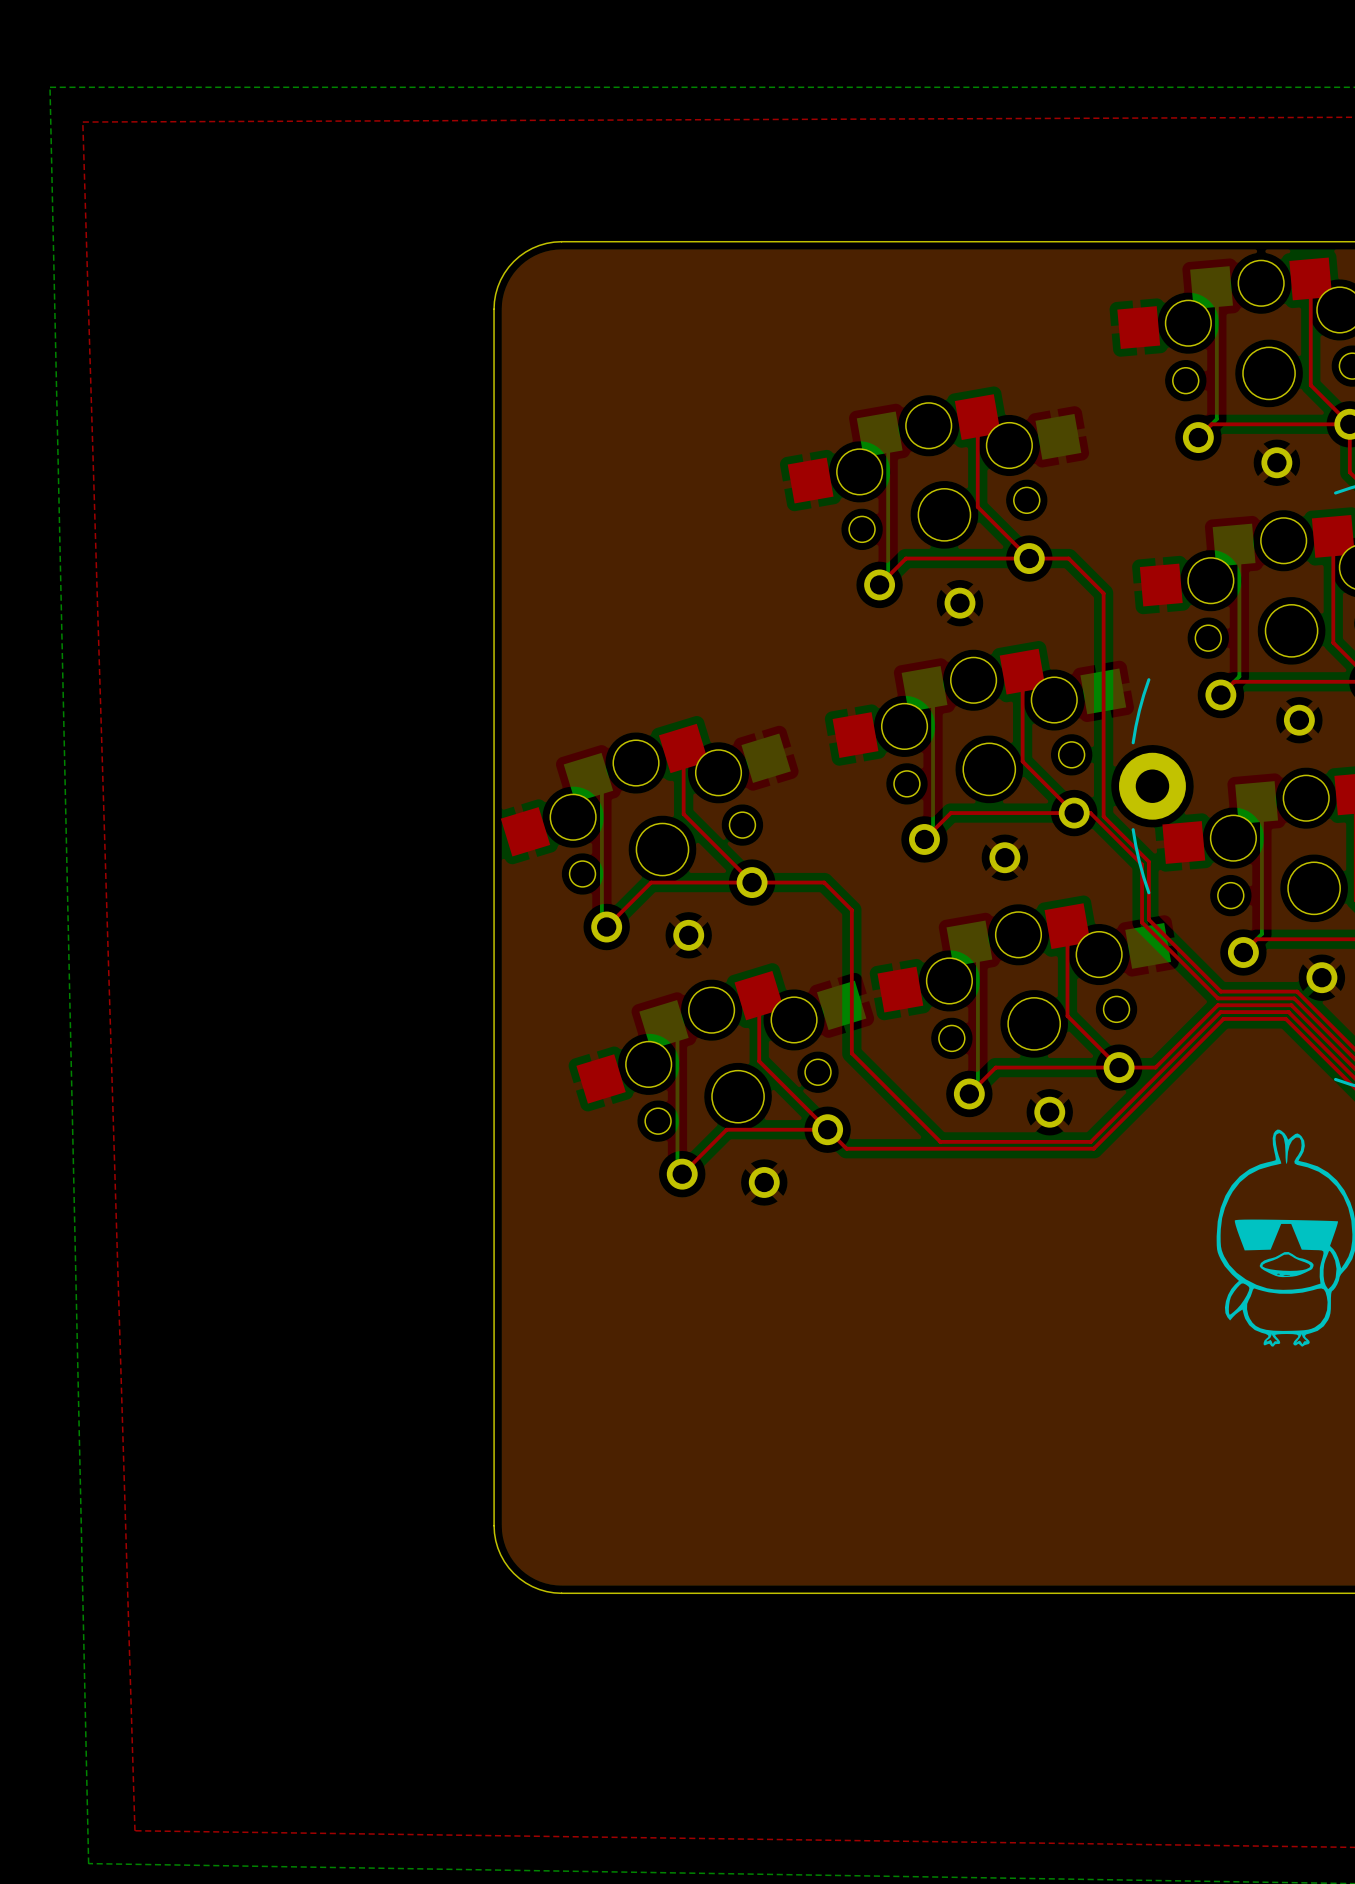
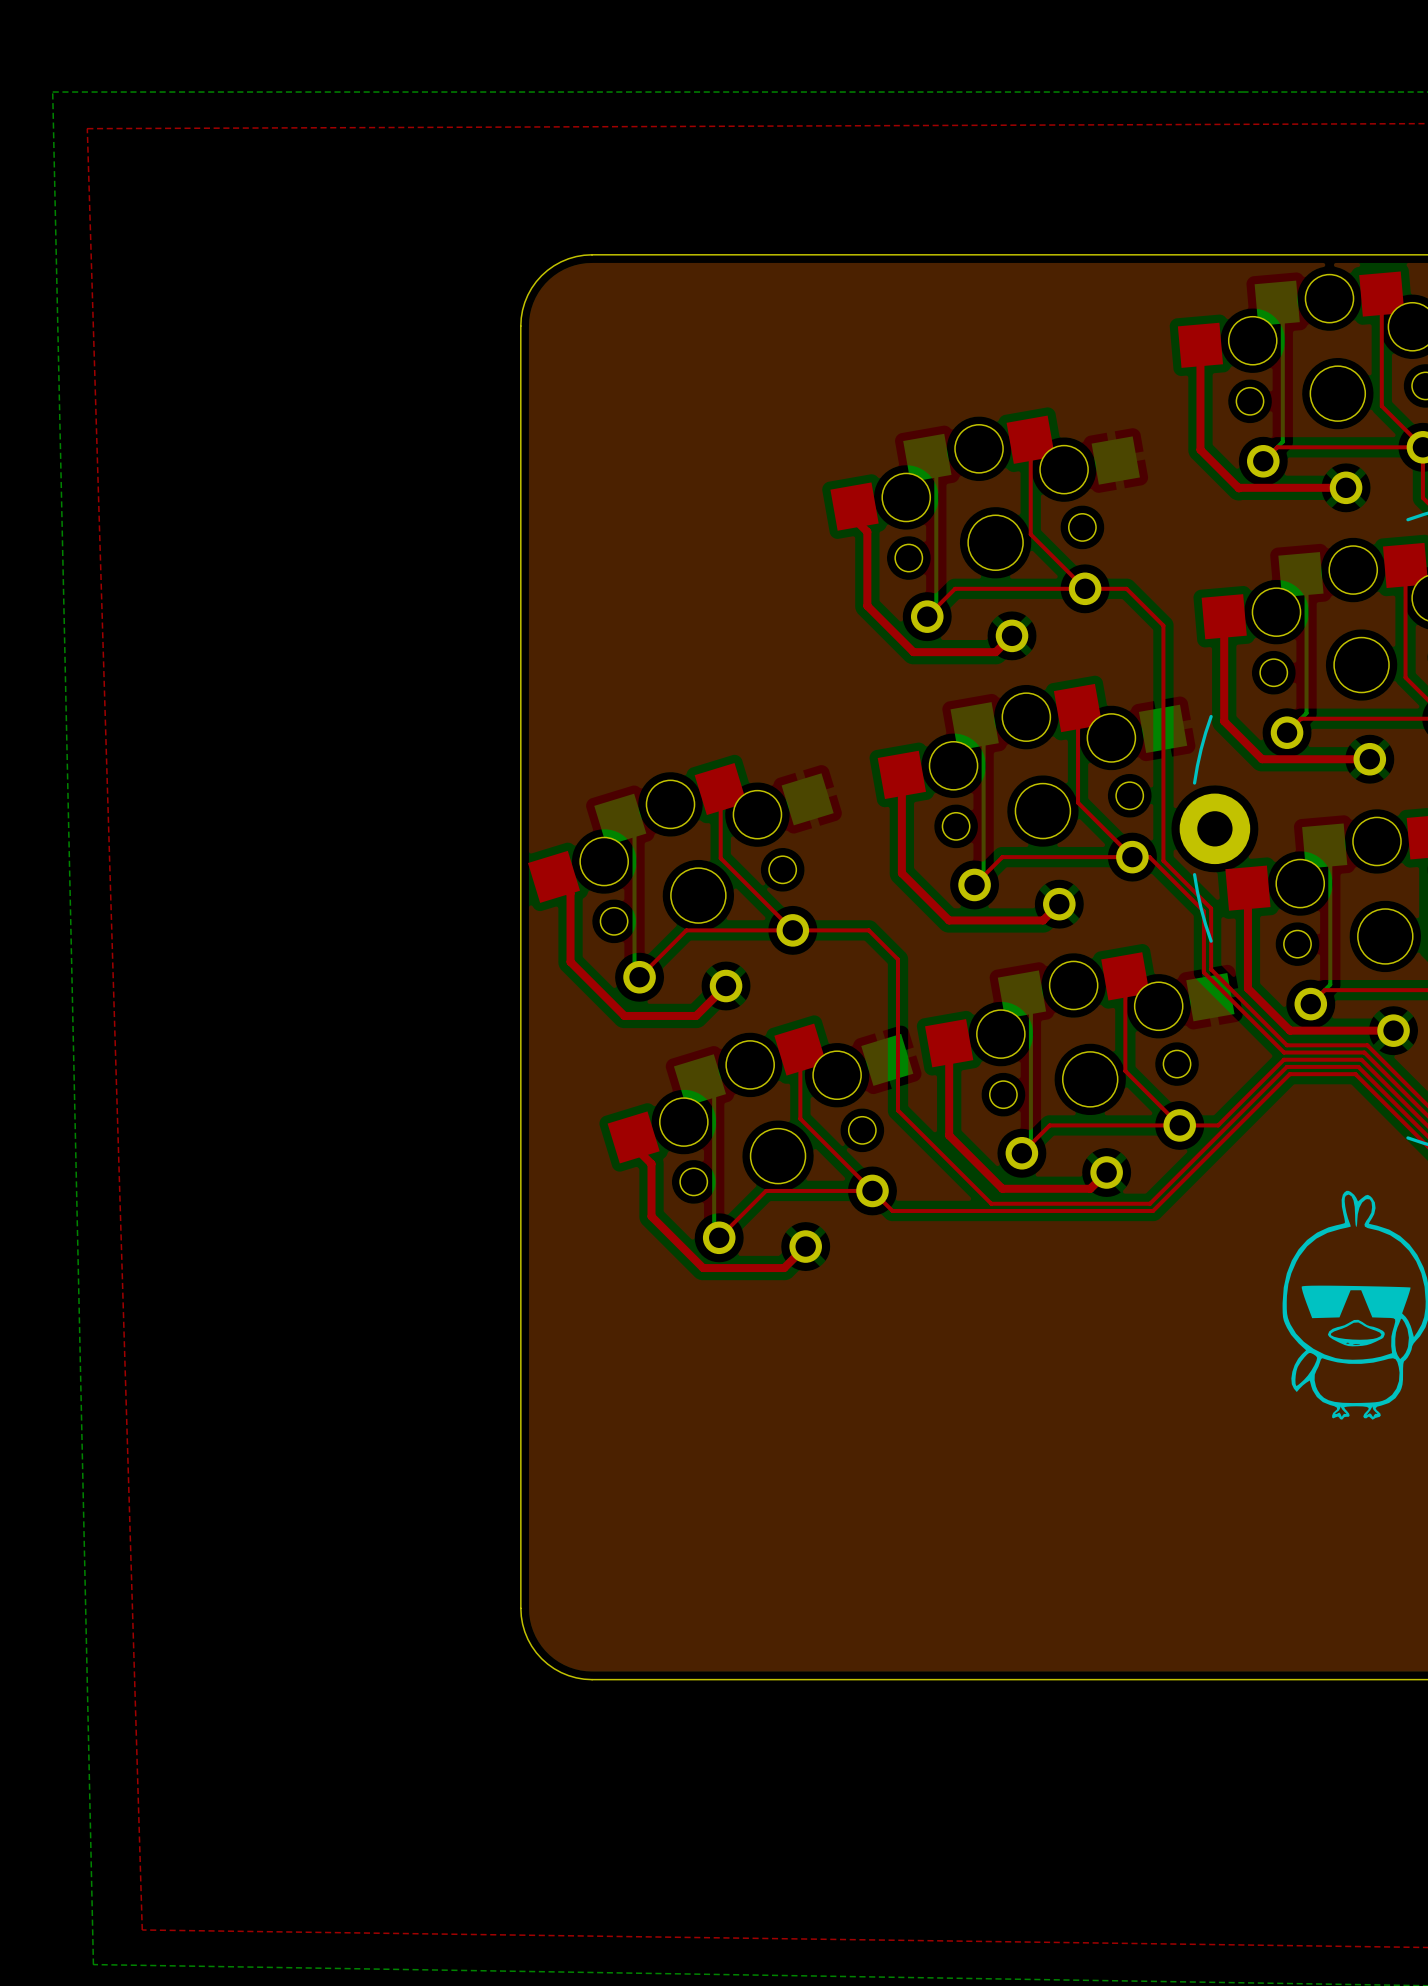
top track: none -> (1200, 345) (1200, 449) (1238, 488) (1346, 487)
top track: none -> (854, 506) (854, 519) (867, 531) (867, 605) (913, 652) (995, 652) (1012, 635)
top track: none -> (1224, 616) (1224, 721) (1262, 759) (1369, 759)
top track: none -> (901, 774) (901, 873) (949, 920) (1043, 920) (1059, 904)
top track: none -> (553, 876) (570, 893) (570, 961) (624, 1015) (696, 1015) (726, 986)
top track: none -> (1247, 888) (1247, 988) (1290, 1030) (1393, 1030)
top track: none -> (949, 1043) (949, 1135) (1002, 1188) (1090, 1188) (1106, 1172)
top track: none -> (633, 1137) (633, 1146) (651, 1163) (651, 1216) (703, 1268) (784, 1268) (805, 1246)

